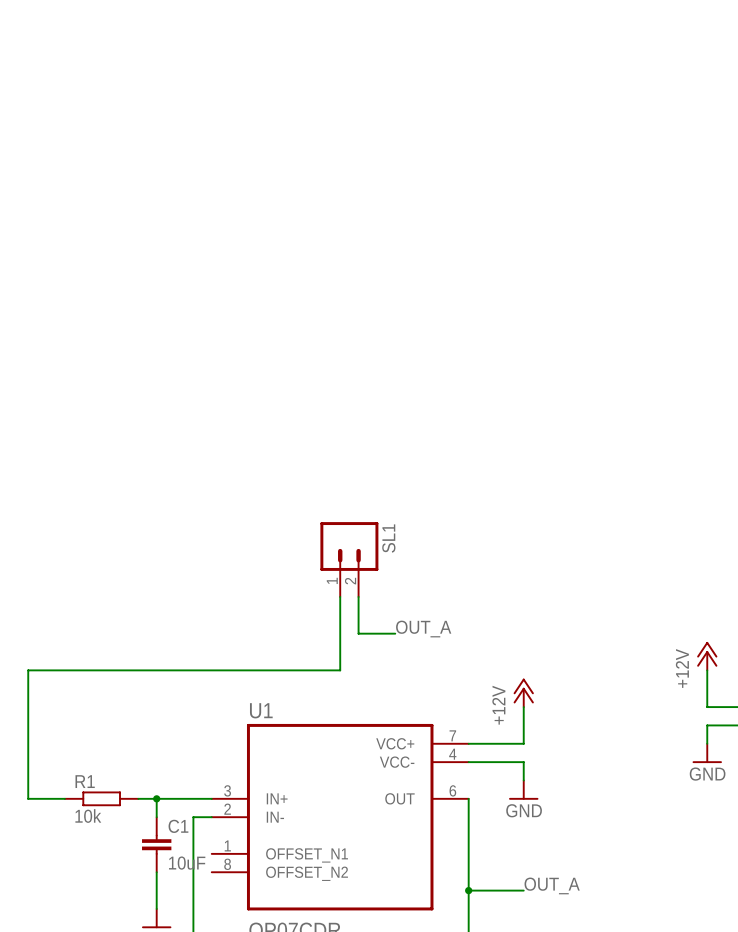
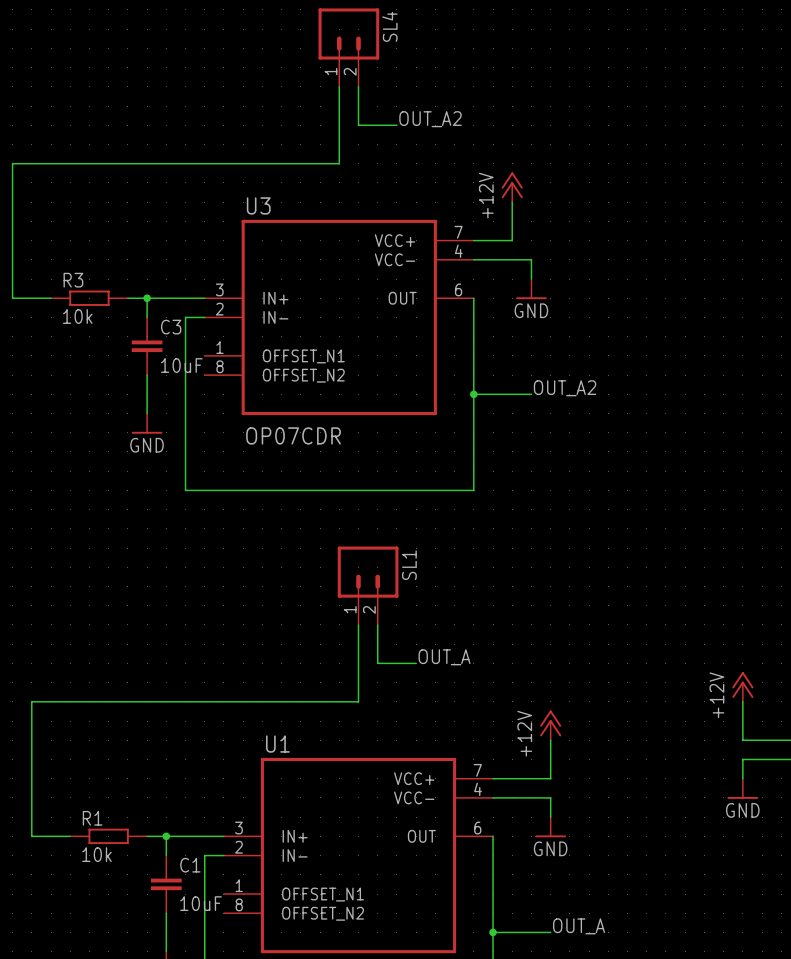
SL4: none -> (348, 47)
wire: none -> (339, 86) (339, 163) (12, 163) (12, 298) (51, 298)
wire: none -> (358, 86) (358, 125) (396, 125)
label: none -> OUT_A2 (430, 119)
power symbol: none -> +12V (512, 187)
wire: none -> (512, 202) (512, 240) (473, 240)
wire: none -> (473, 259) (531, 259) (531, 279)
power symbol: none -> GND (531, 289)
R3: none -> 10k (89, 298)
wire: none -> (127, 298) (204, 298)
wire: none -> (147, 298) (147, 317)
junction: none -> (147, 298)
wire: none -> (473, 298) (473, 490) (185, 490) (185, 317) (204, 317)
U3: none -> OP07CDR (339, 317)
C3: none -> 10uF (147, 346)
wire: none -> (147, 375) (147, 413)
label: none -> OUT_A2 (565, 388)
wire: none -> (473, 394) (531, 394)
junction: none -> (473, 394)
power symbol: none -> GND (147, 423)

